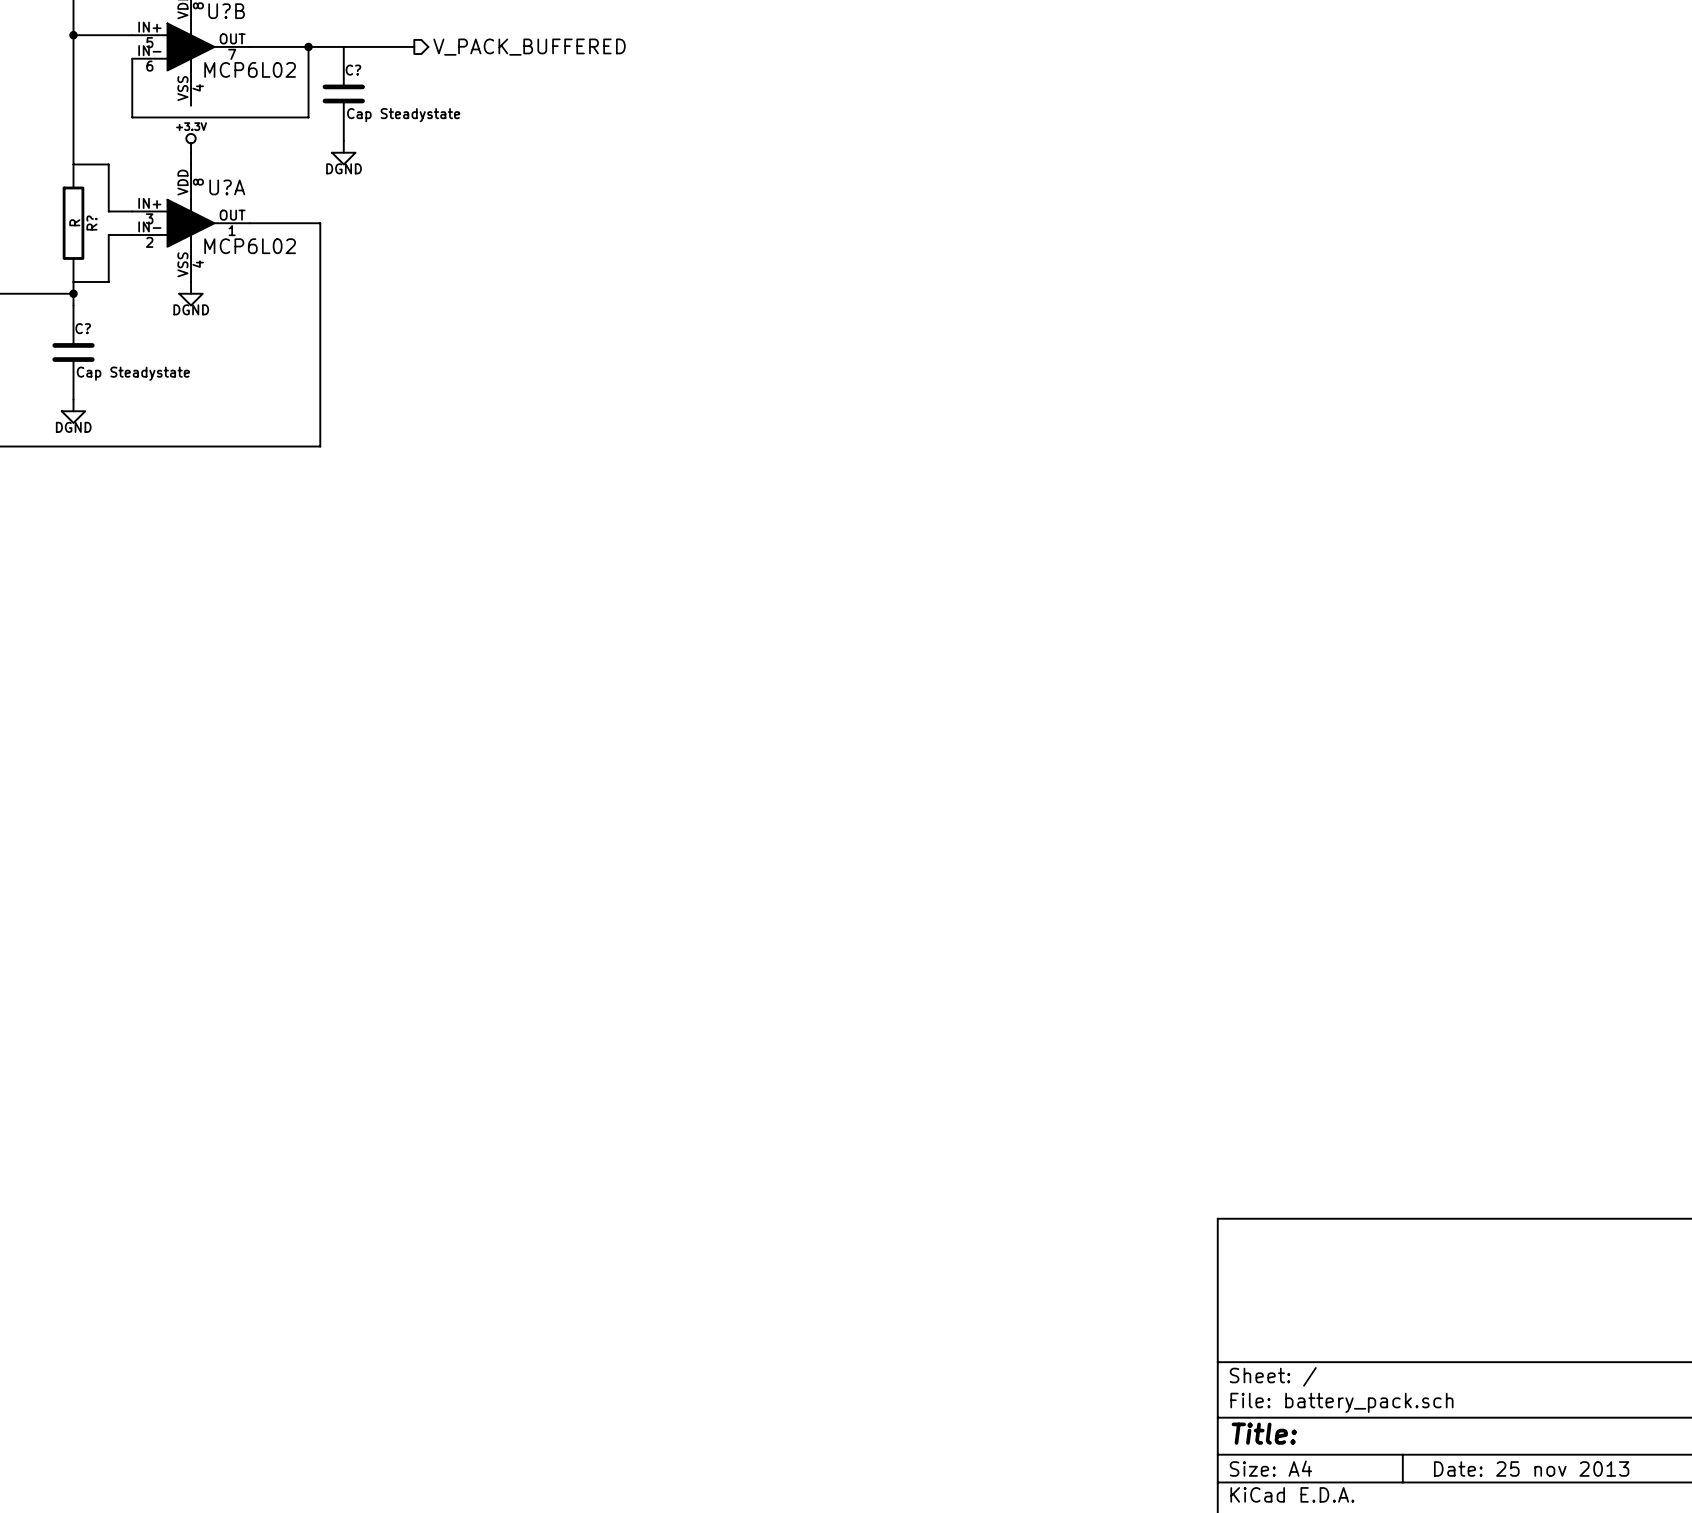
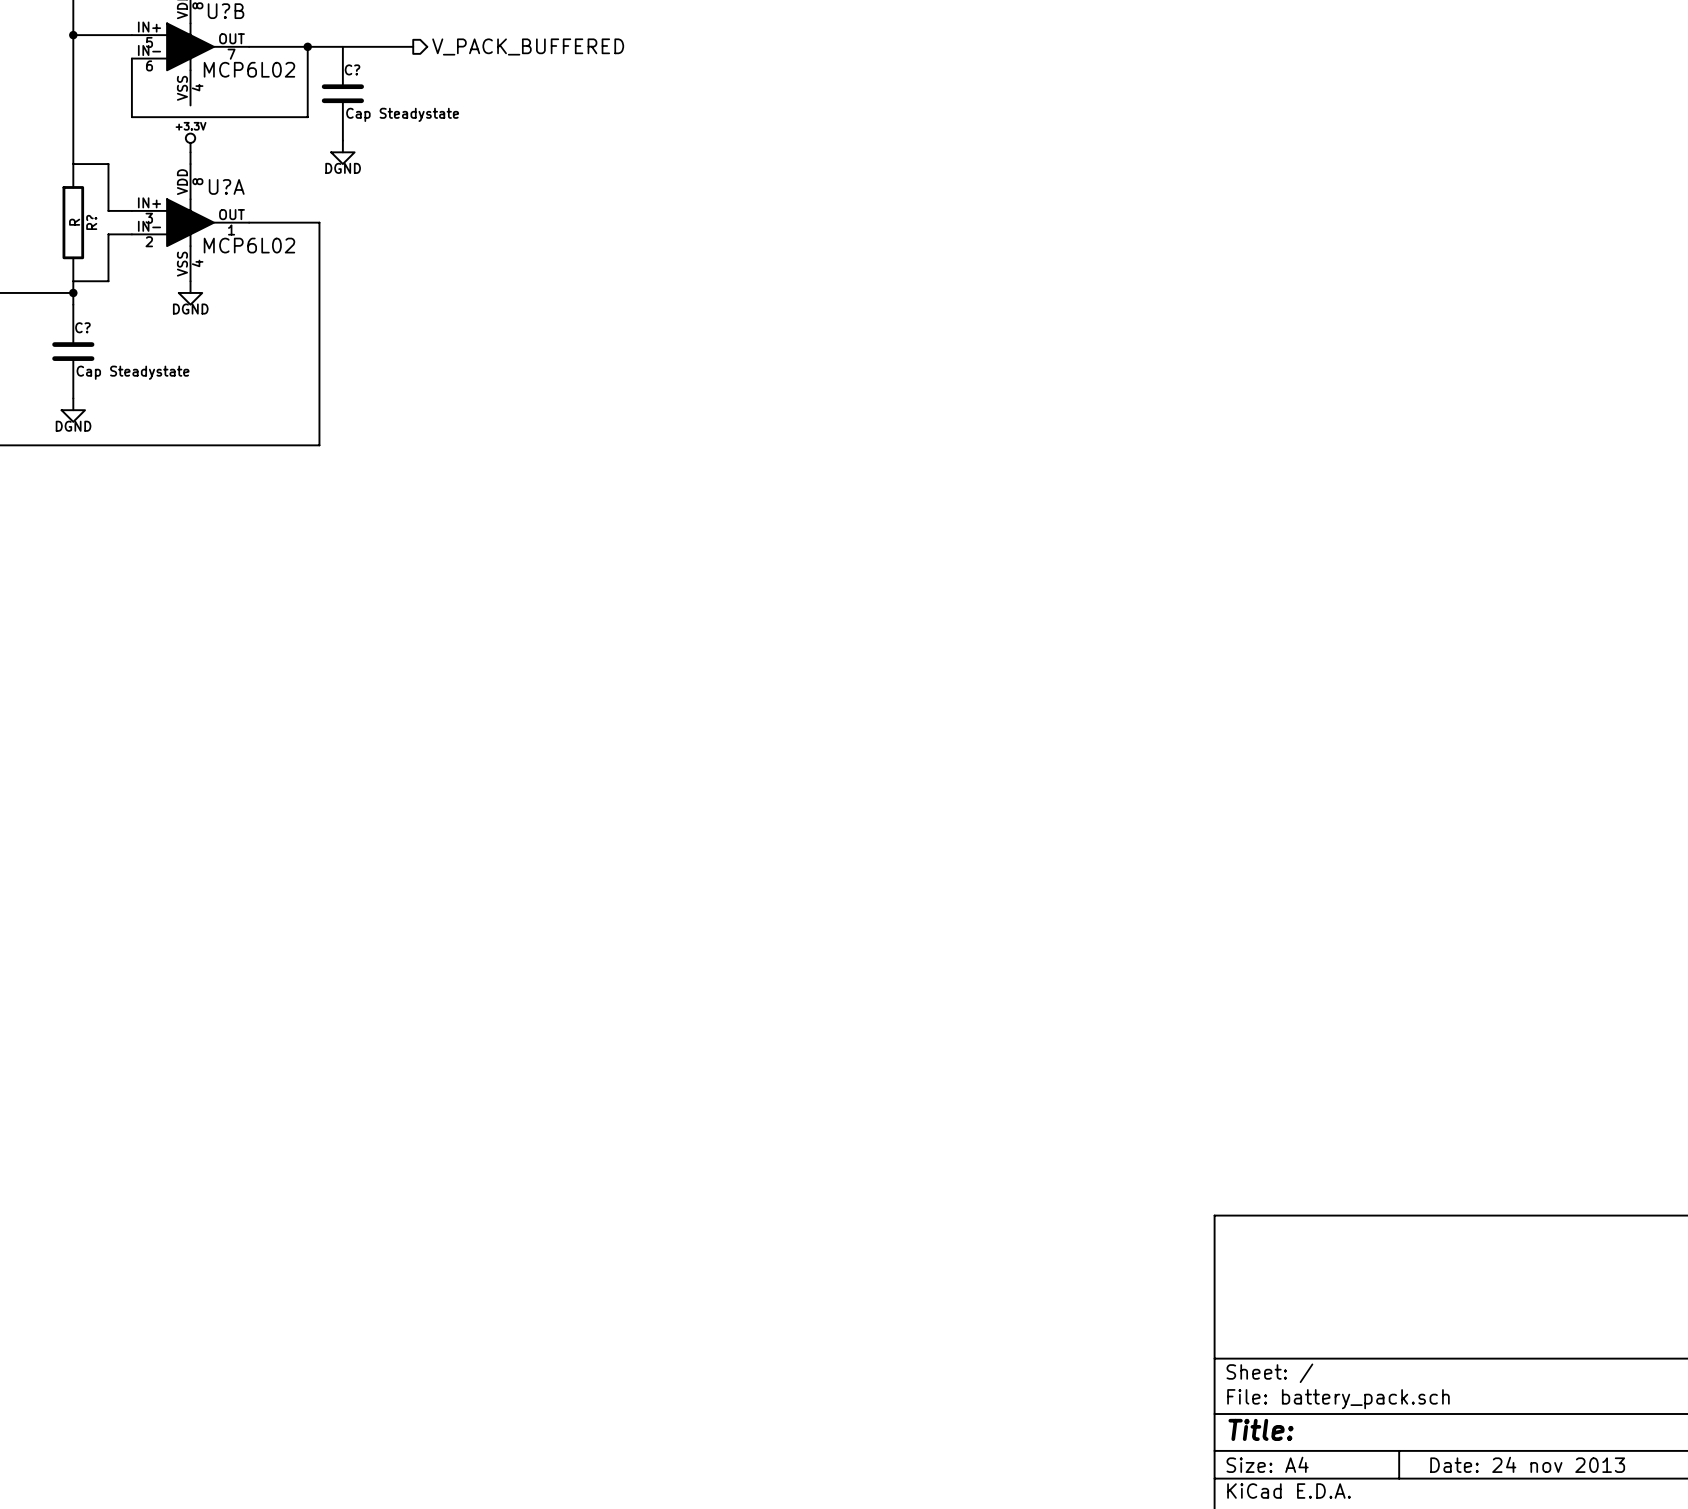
title block: Date: 25 nov 2013 (1531, 1468) -> Date: 24 nov 2013 (1527, 1464)

